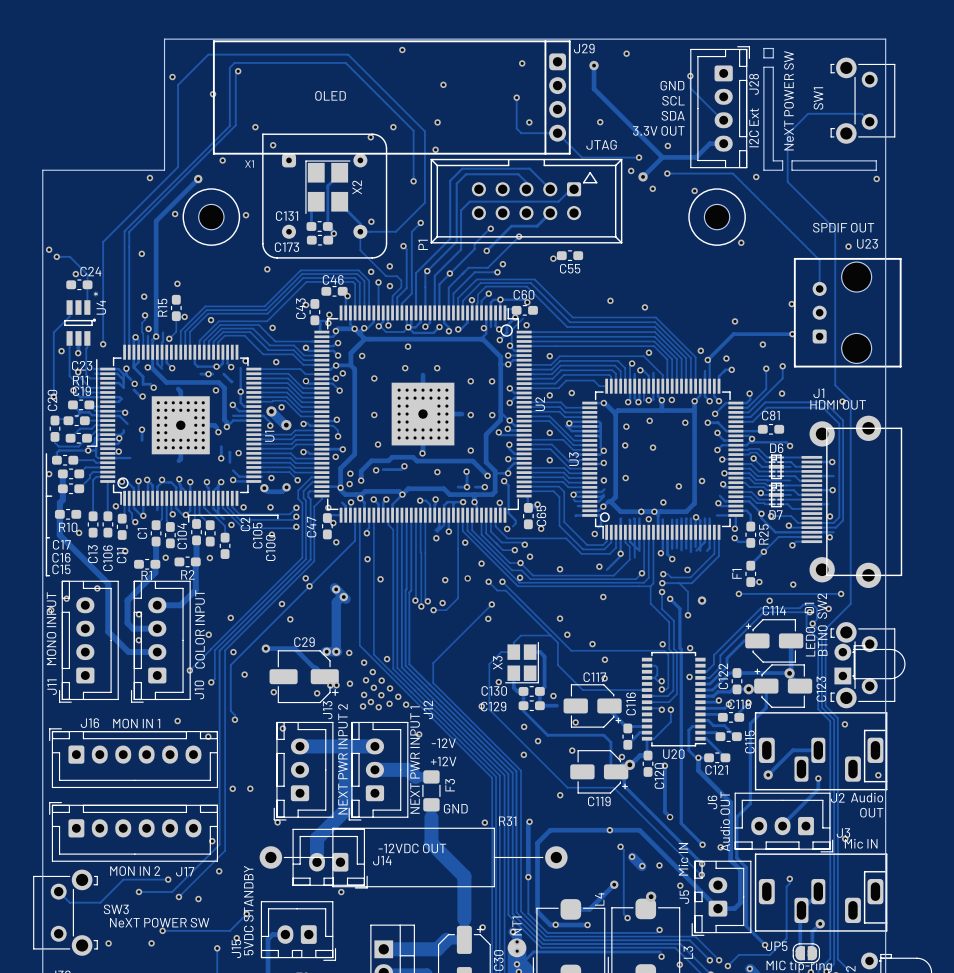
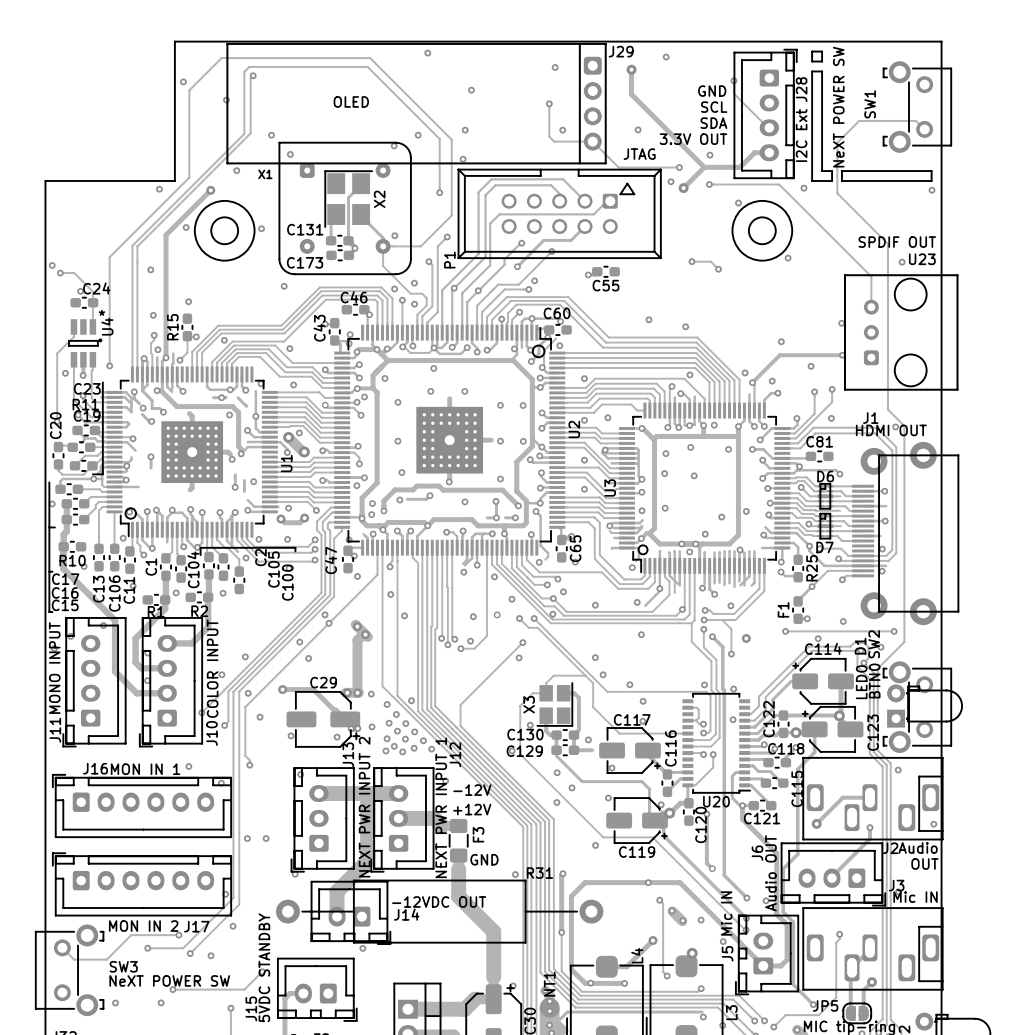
via: (652, 188) -> none
track: none -> (691, 261) (710, 261) (718, 269)
via: none -> (691, 261)
via: none -> (718, 269)
via: (236, 938) -> none

